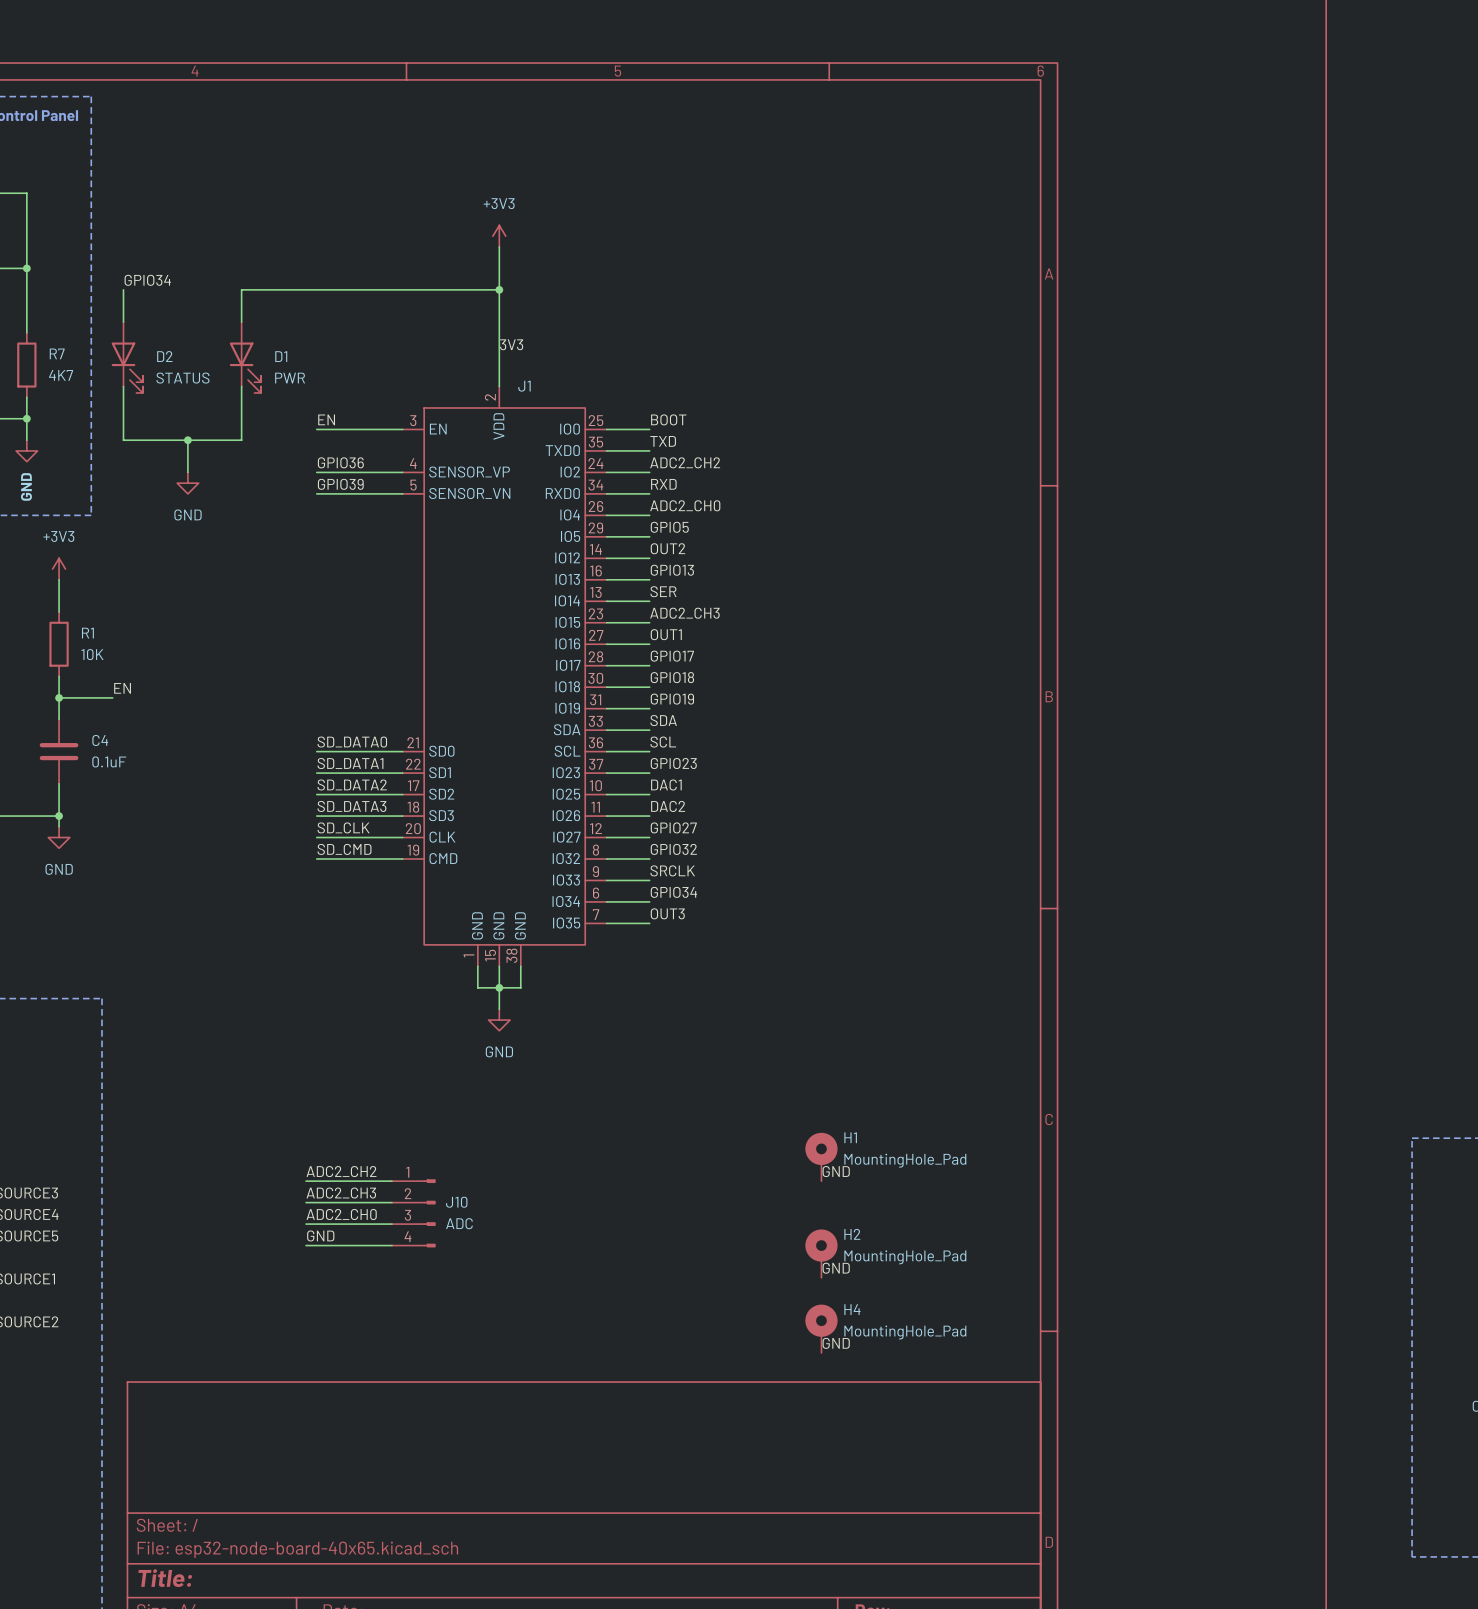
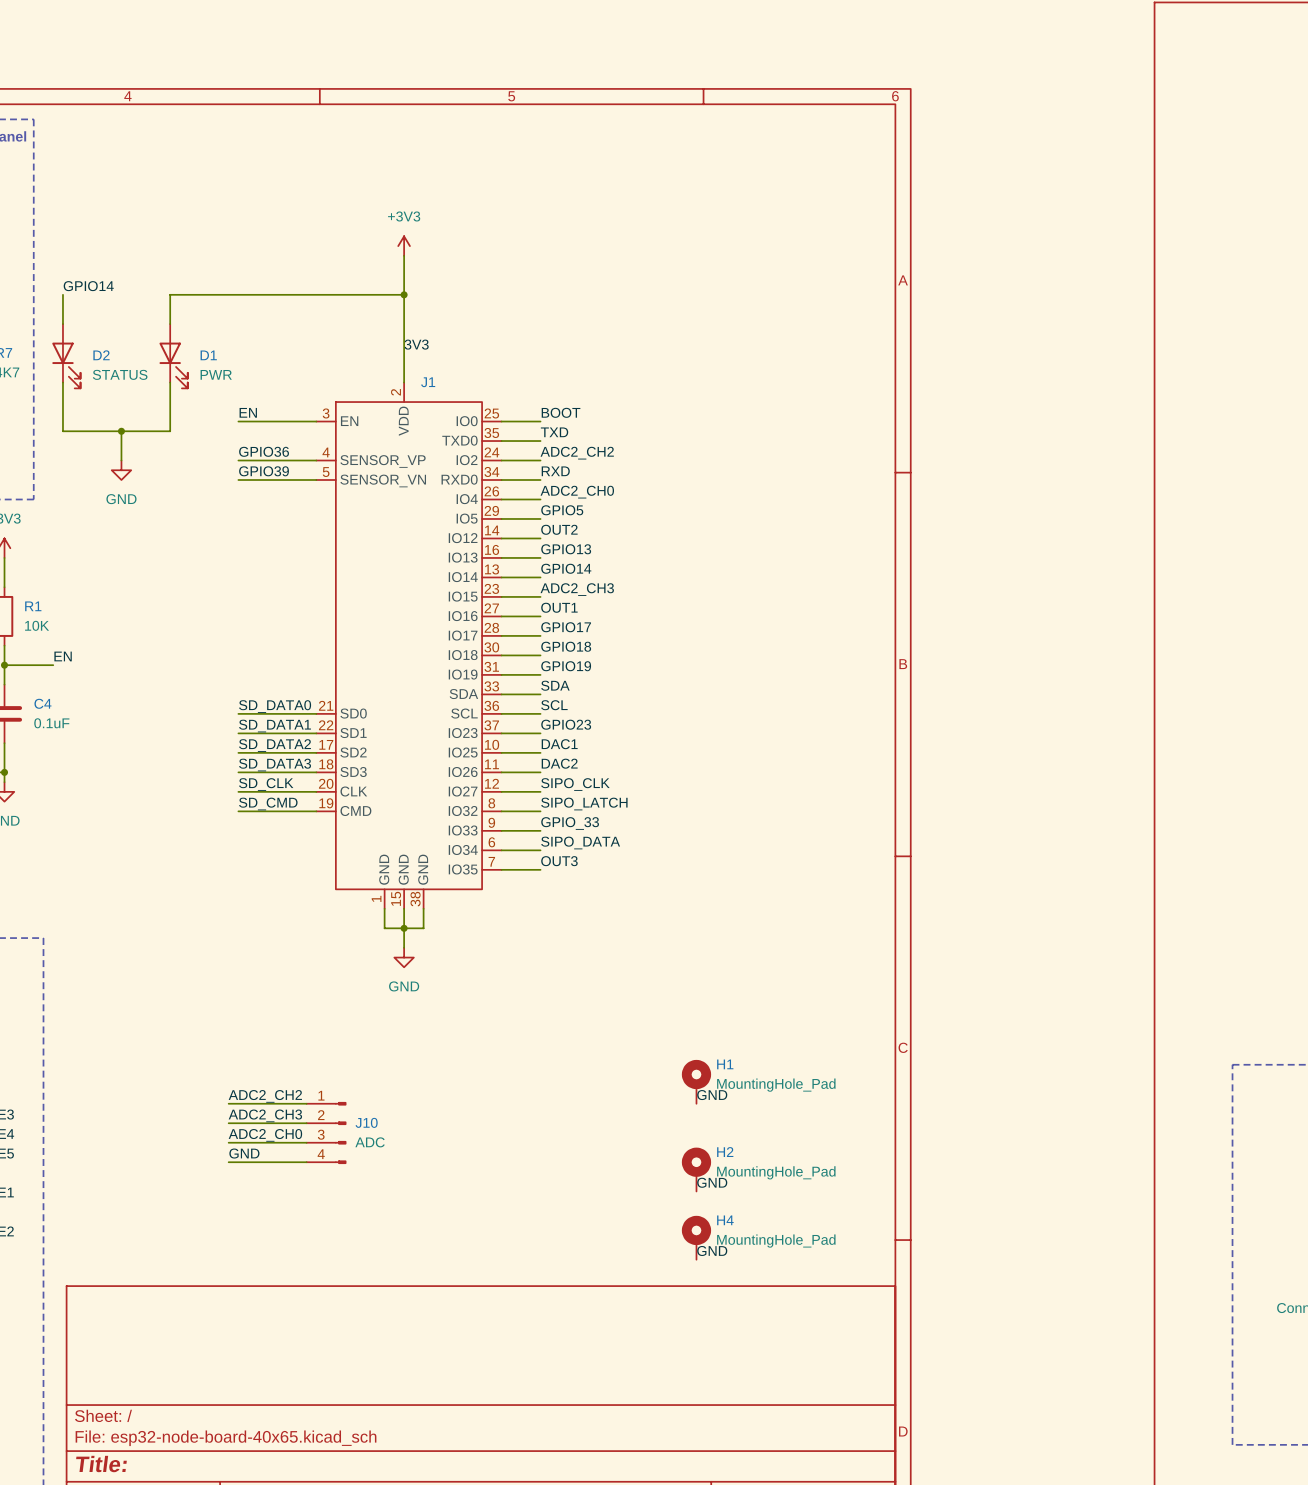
label: GPIO34 (147, 280) -> GPIO14 (88, 286)
label: SER (663, 591) -> GPIO14 (566, 568)
label: GPIO27 (673, 827) -> SIPO_CLK (575, 784)
label: GPIO32 (673, 849) -> SIPO_LATCH (584, 804)
label: SRCLK (672, 870) -> GPIO_33 (570, 823)
label: GPIO34 (673, 892) -> SIPO_DATA (580, 842)

